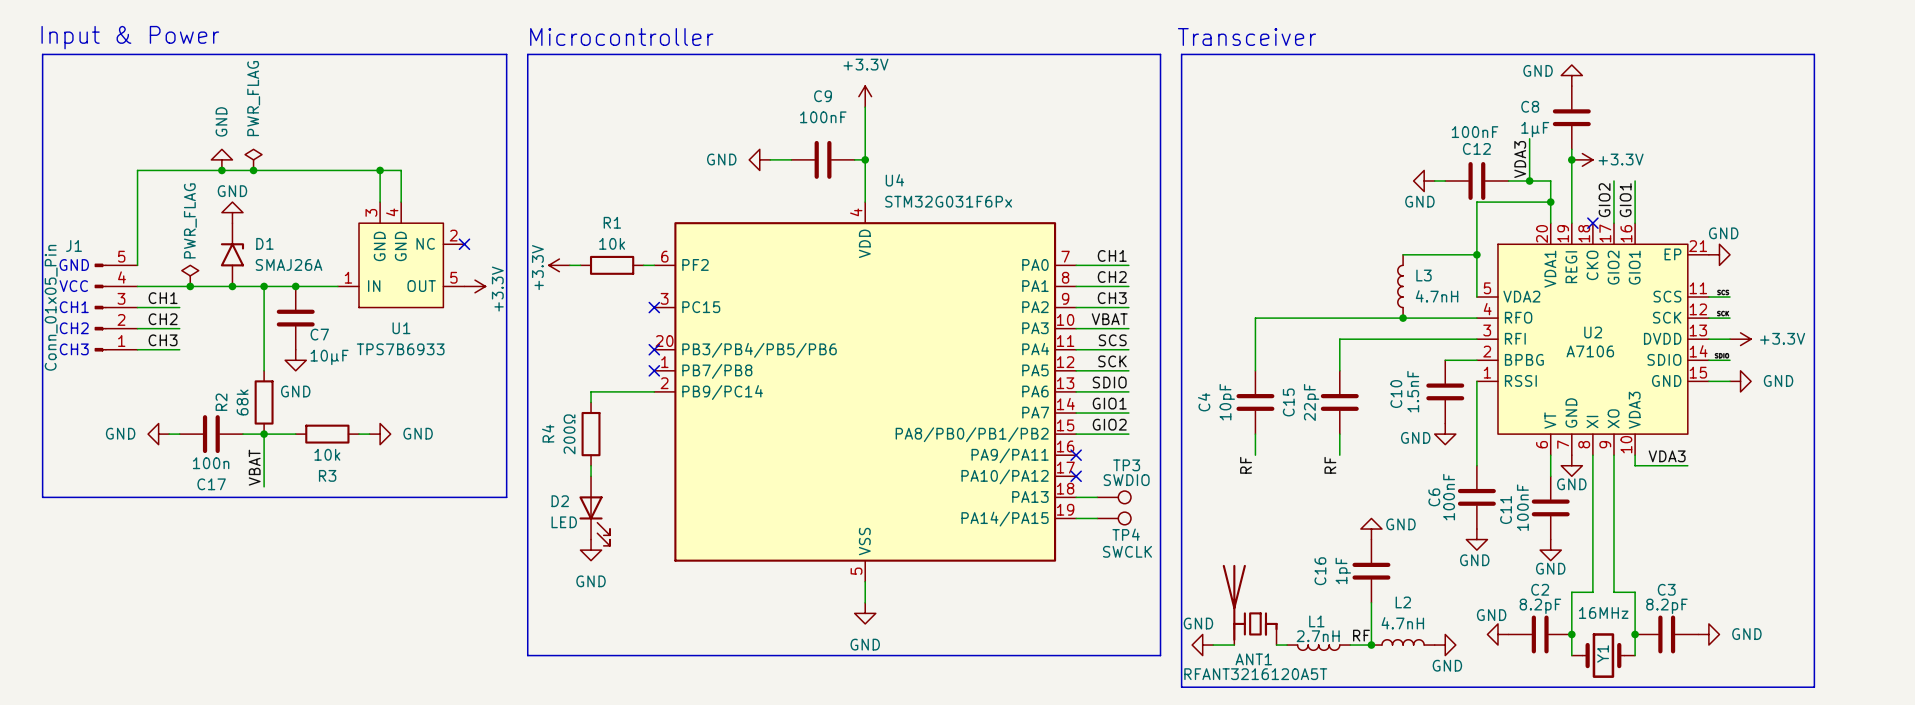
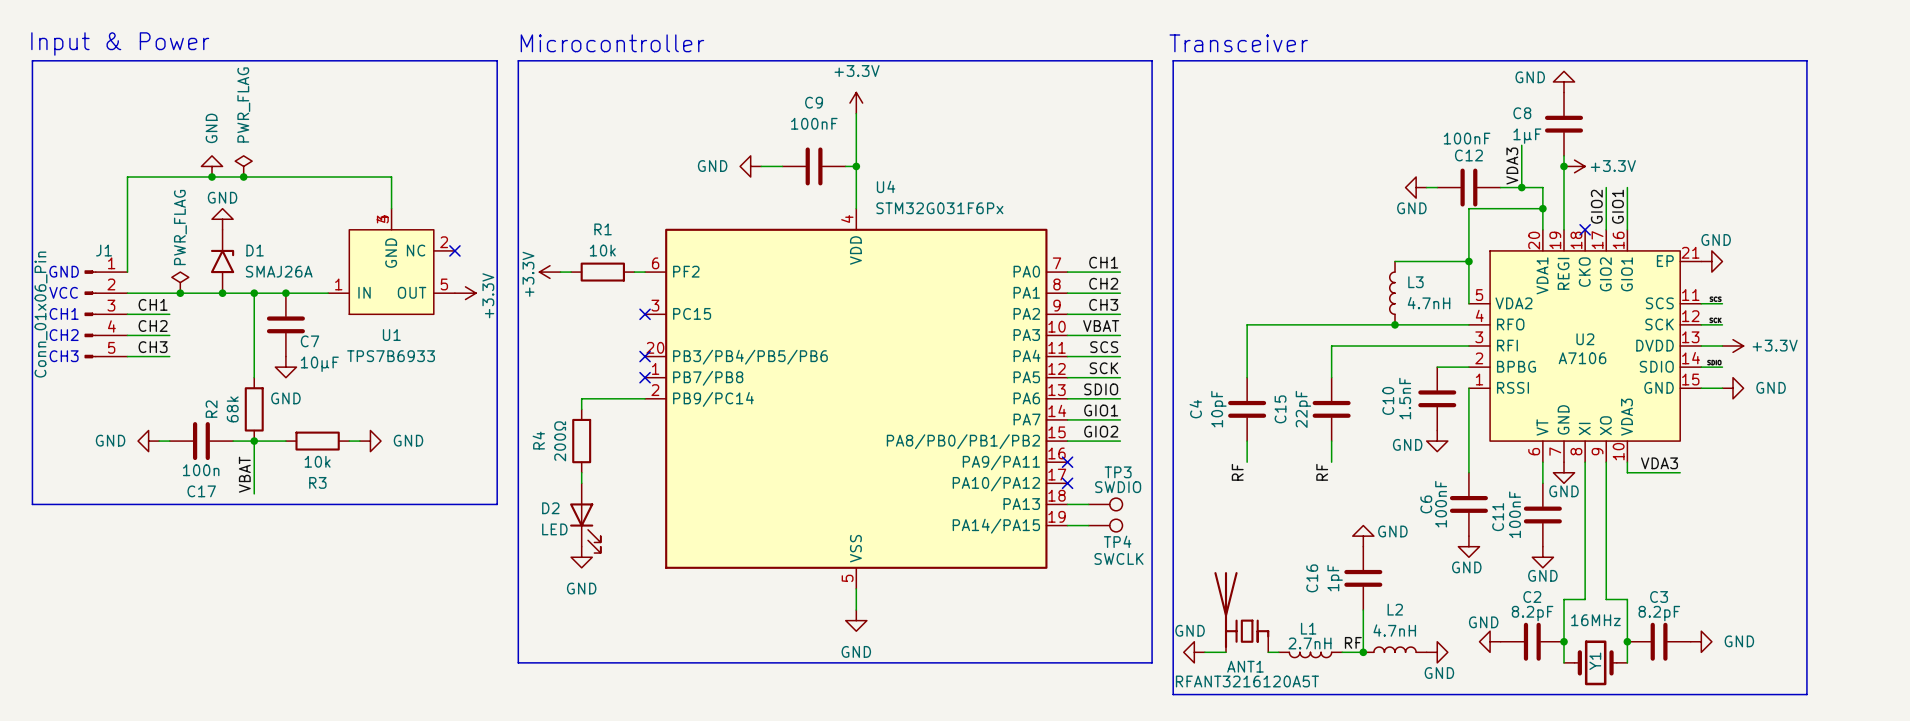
wire: (380, 170) (380, 202) -> none
junction: (380, 170) -> none
U1 symbol: [337, 202, 465, 309] -> [328, 208, 455, 315]
J1 name position: J1 (74, 245) -> J1 (104, 250)
J1 value: Conn_01x05_Pin (51, 307) -> Conn_01x06_Pin (40, 314)
J1 flip: as is (100, 307) -> up-down (90, 314)

